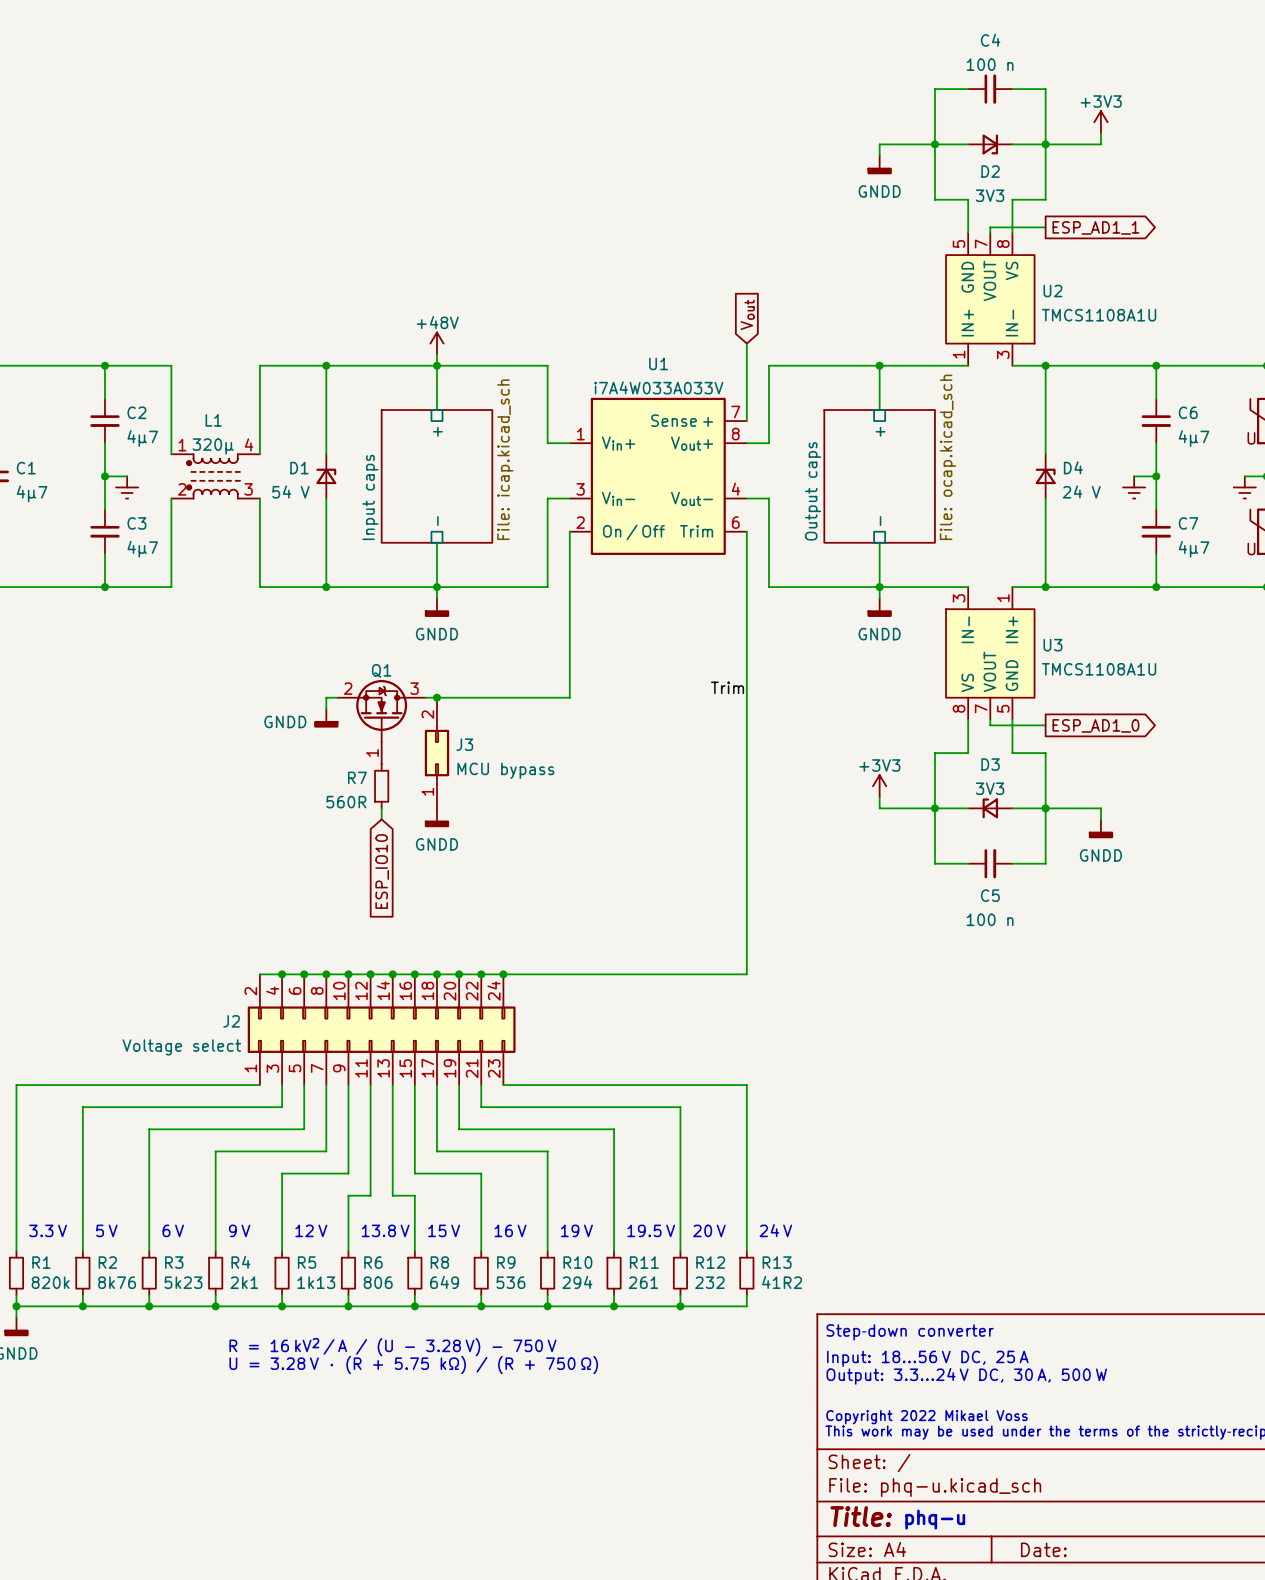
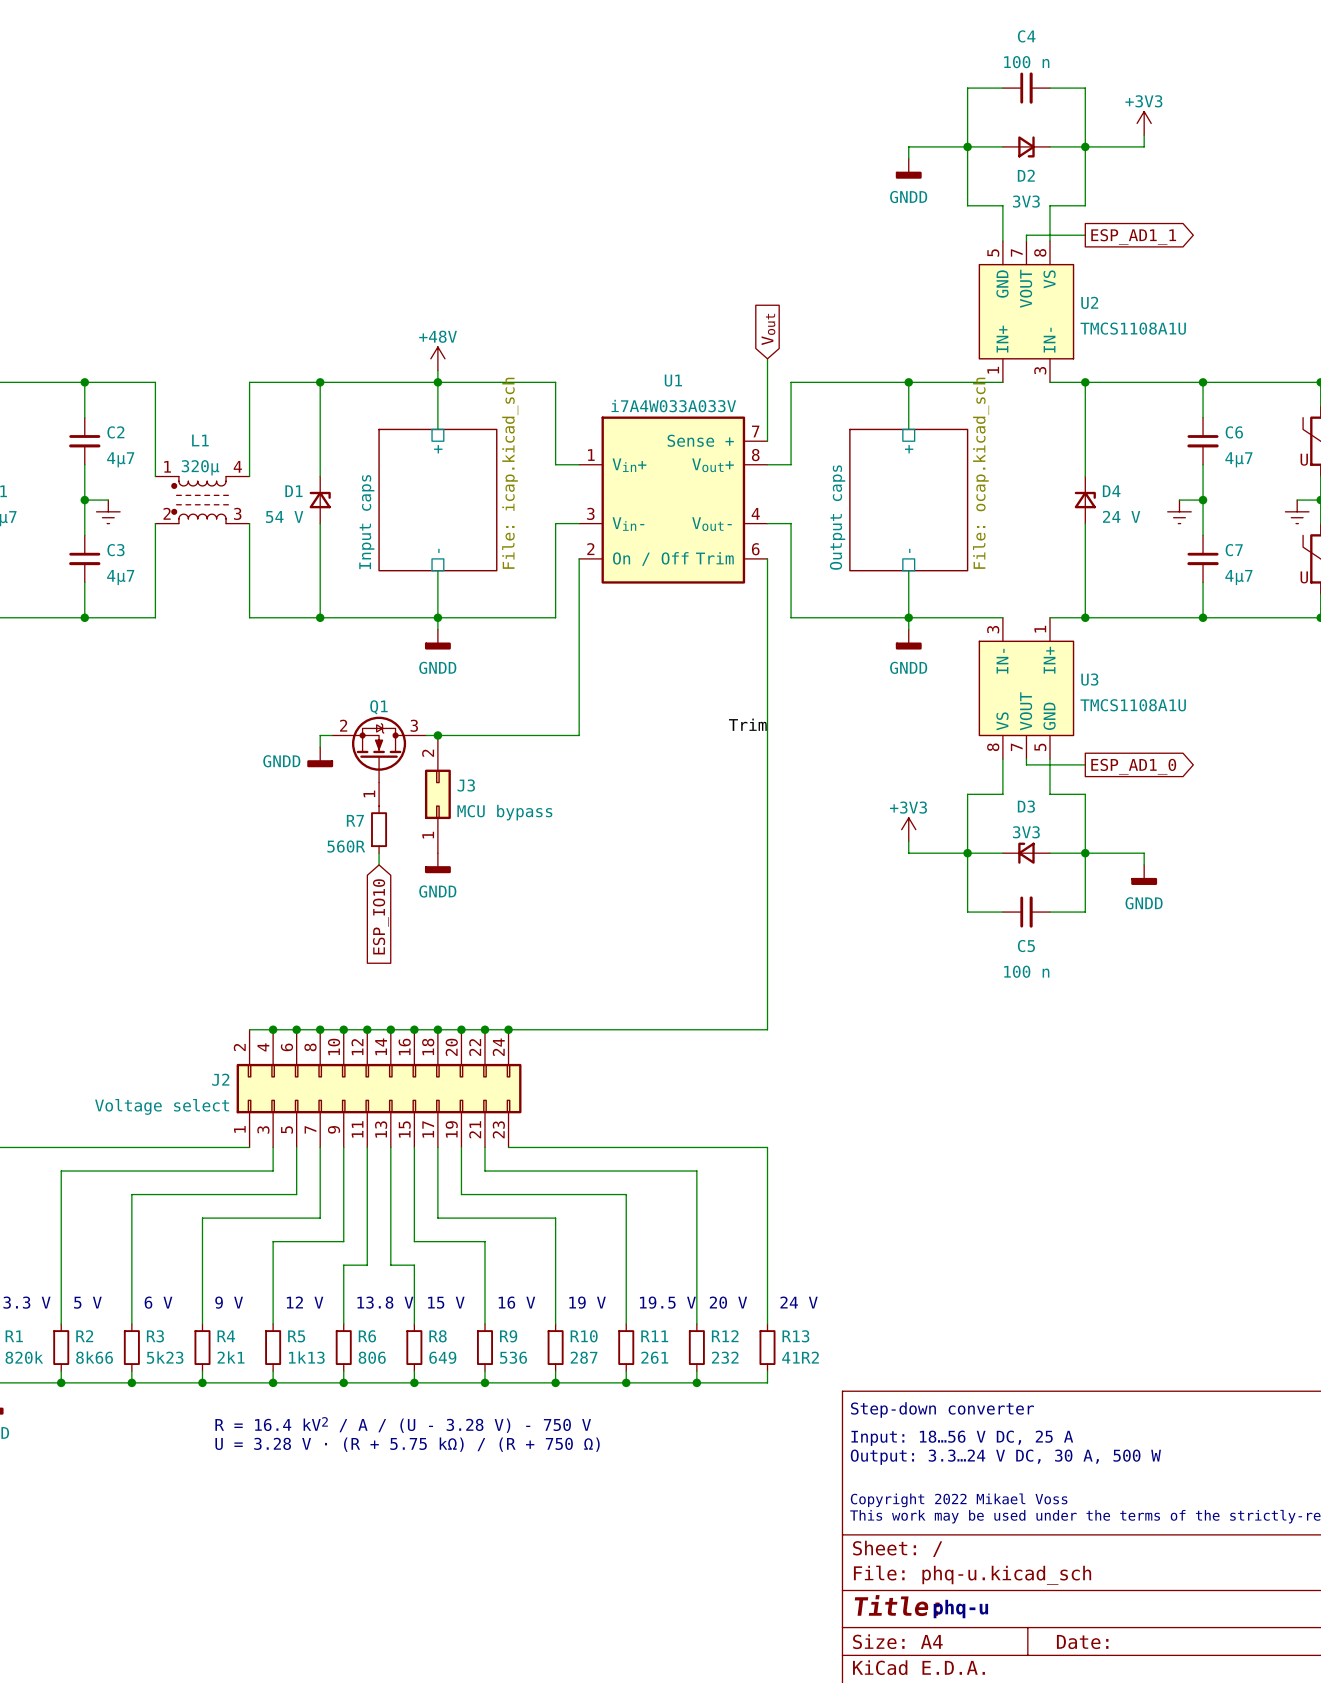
R2 value: 8k76 (117, 1282) -> 8k66 (94, 1357)
R10 value: 294 (577, 1282) -> 287 (584, 1357)
text: R = 16 kV2 / A / (U - 3.28 V) - 750 V (393, 1347) -> R = 16.4 kV2 / A / (U - 3.28 V) - 750 V (403, 1425)

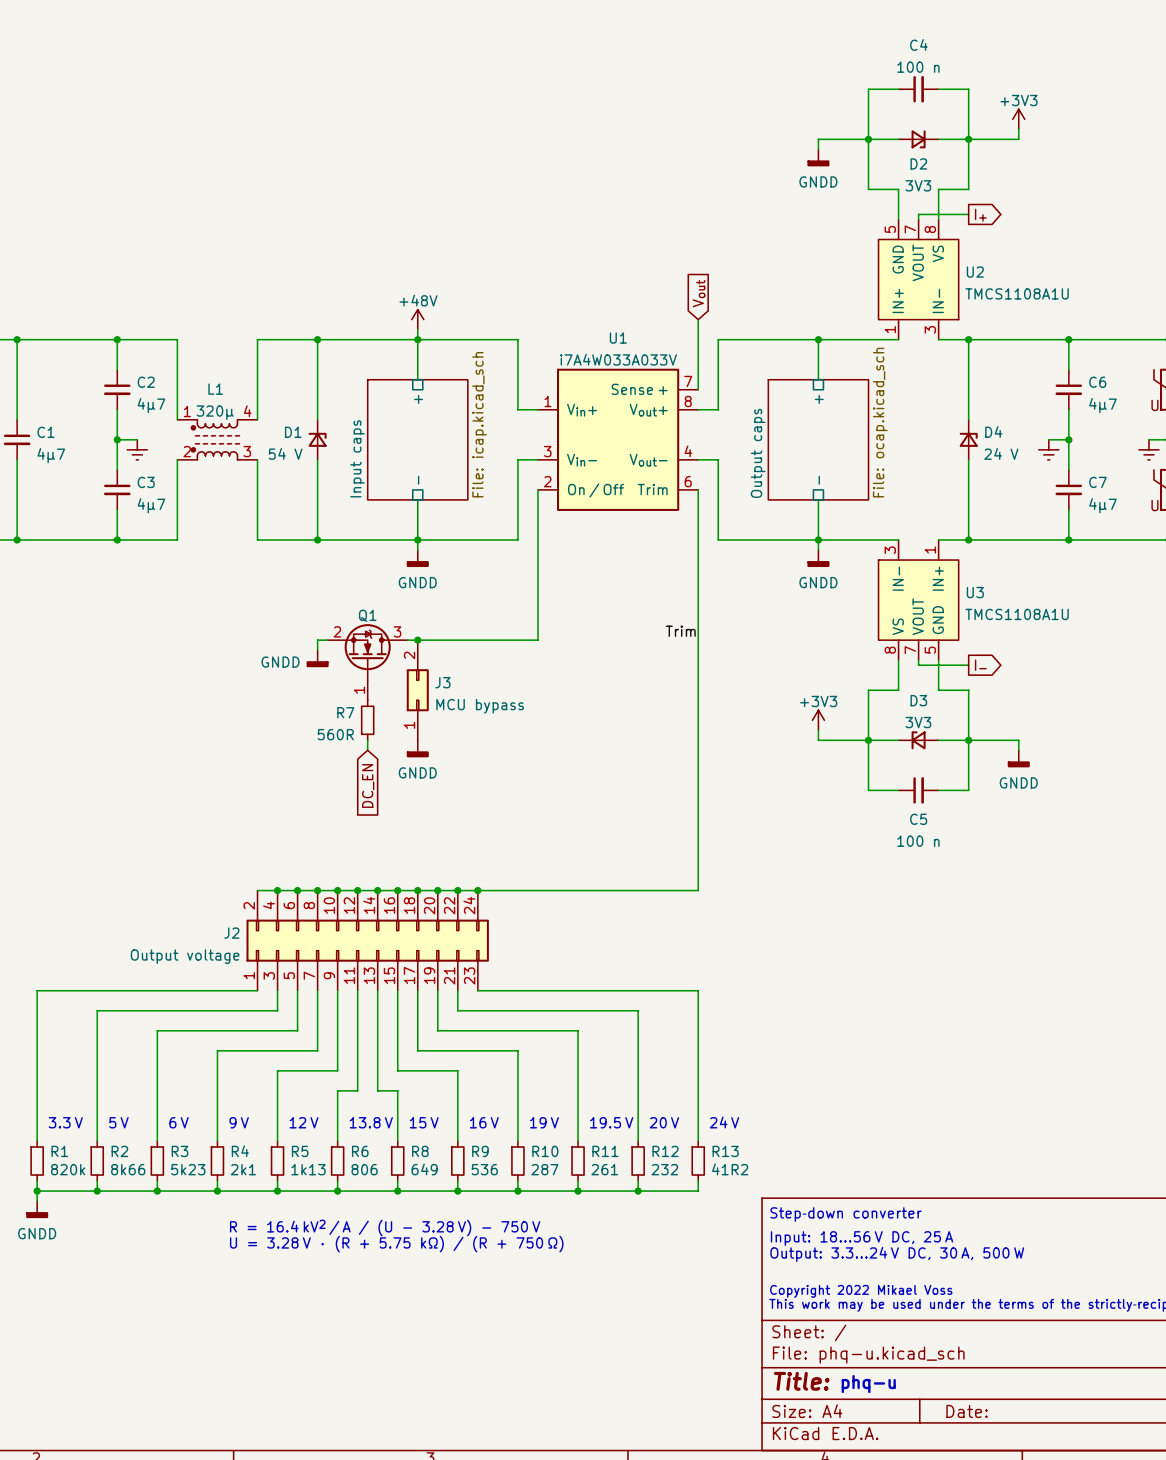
global label: ESP_AD1_1 (1133, 237) -> I+ (980, 215)
global label: ESP_AD1_0 (1133, 766) -> I- (980, 665)
global label: ESP_IO10 (380, 916) -> DC_EN (368, 786)
J2 value: Voltage select (162, 1106) -> Output voltage (185, 956)

